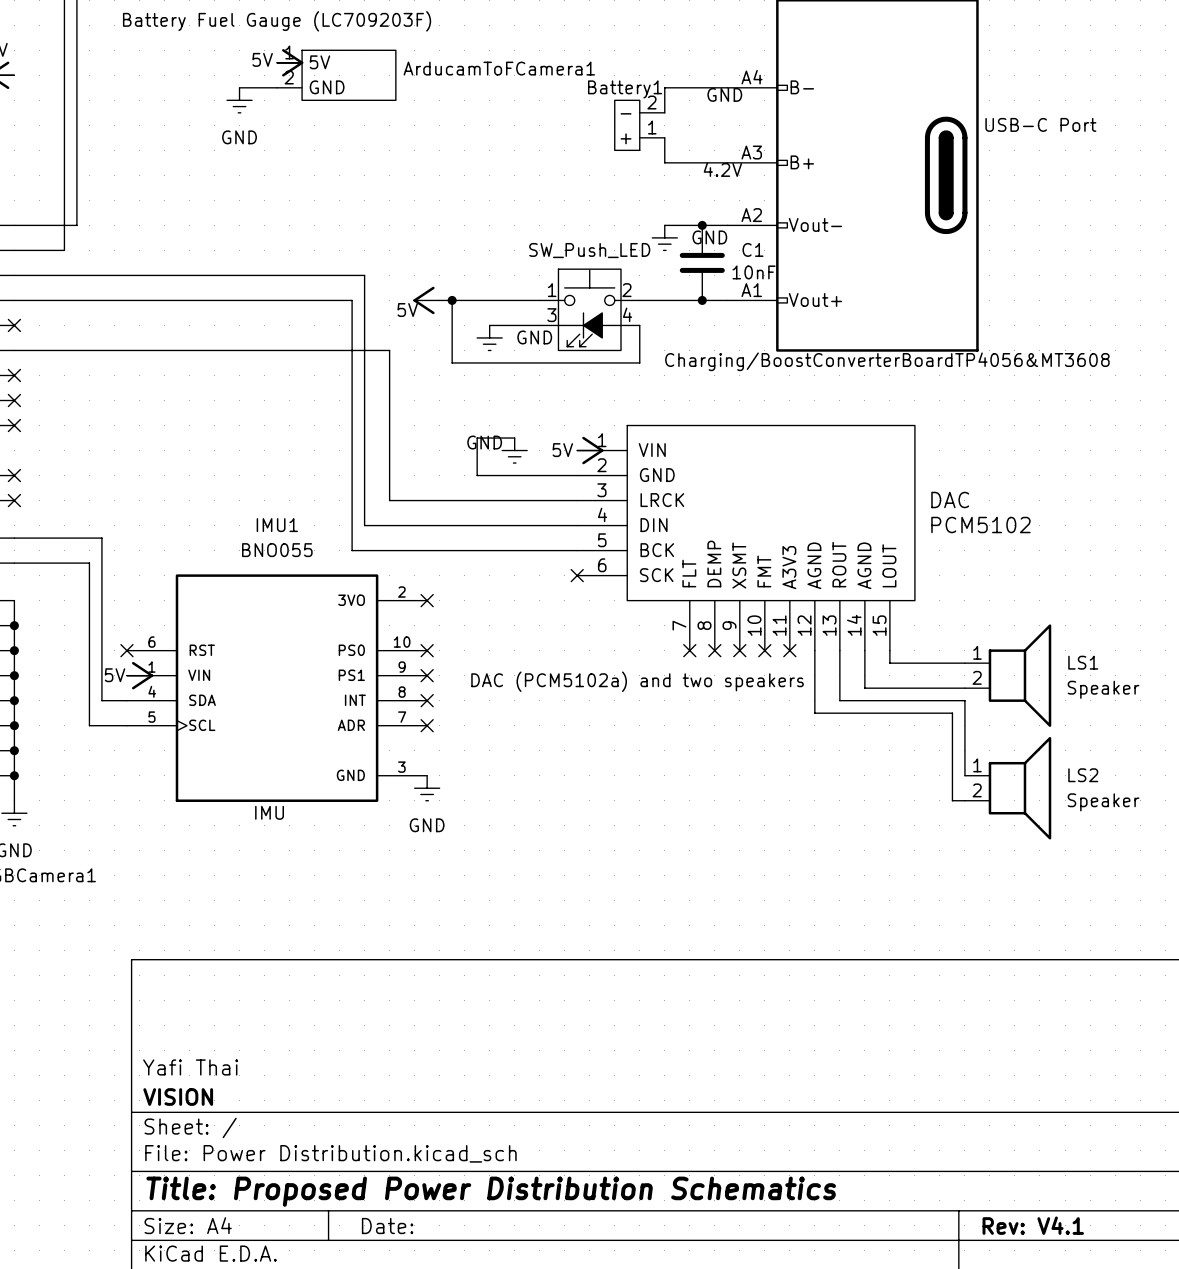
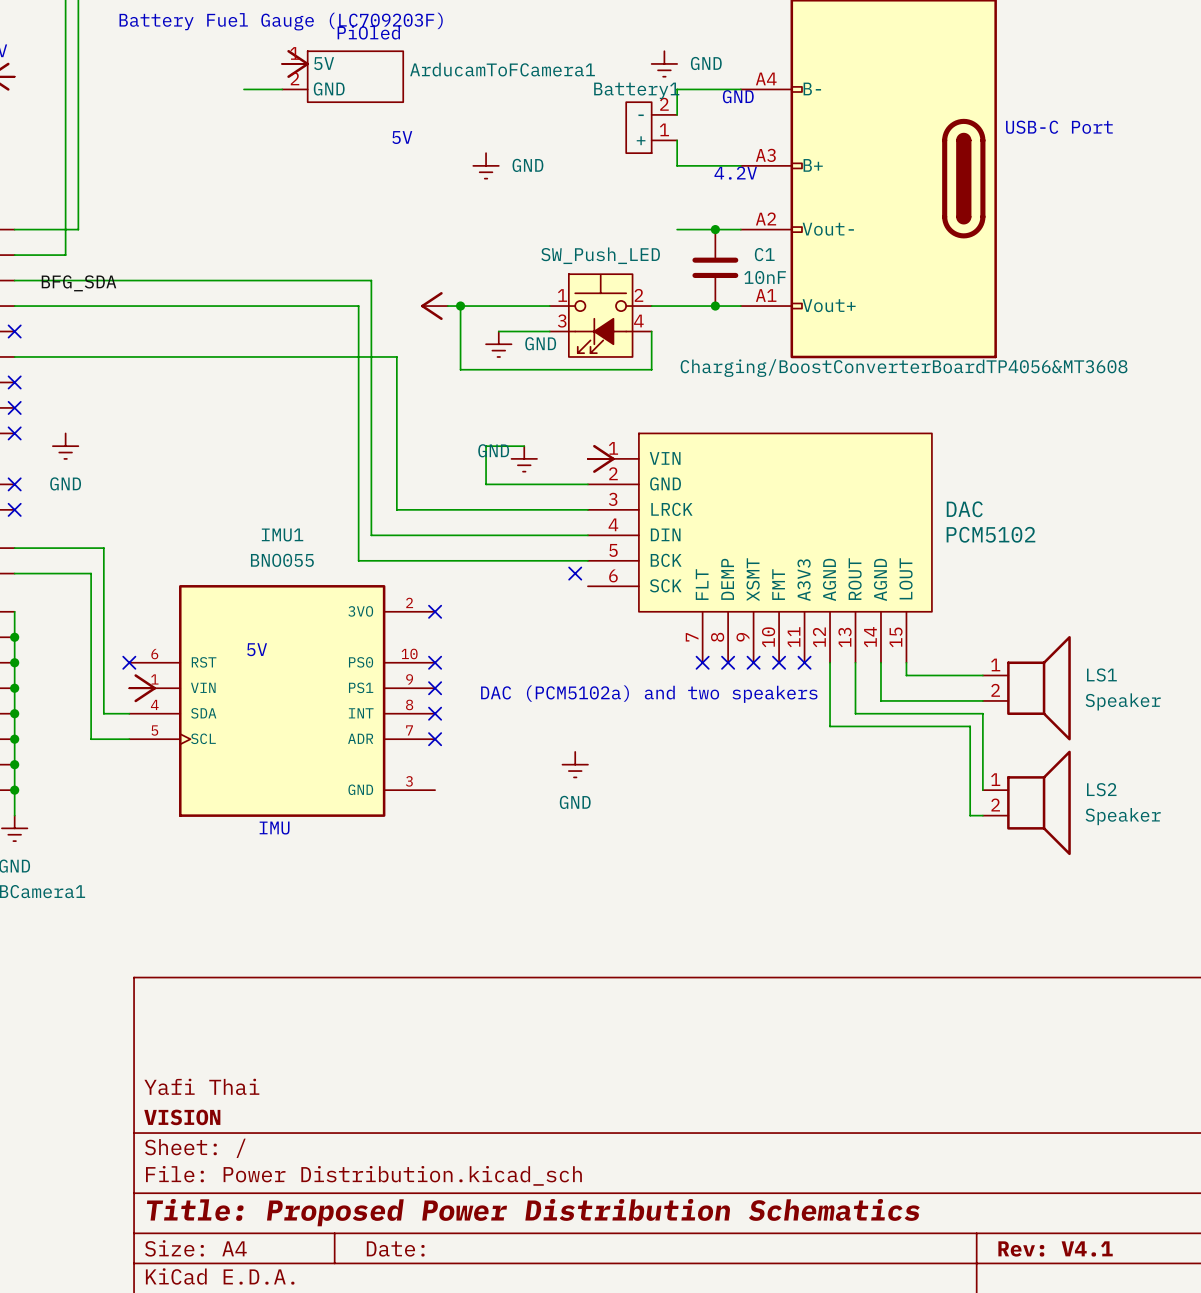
text: none -> PiOled (368, 32)
text: 5V (262, 59) -> none
power symbol: none -> GND (664, 63)
power symbol: GND (239, 100) -> none
text: none -> 5V (402, 137)
power symbol: none -> GND (486, 165)
power symbol: GND (664, 237) -> none
label: none -> BFG_SDA (79, 283)
text: 5V (407, 310) -> none
power symbol: none -> GND (65, 446)
text: 5V (562, 450) -> none
no-connect mark position: (577, 575) -> (575, 573)
text position: 5V (115, 675) -> 5V (257, 649)
power symbol position: GND (427, 788) -> GND (575, 764)

